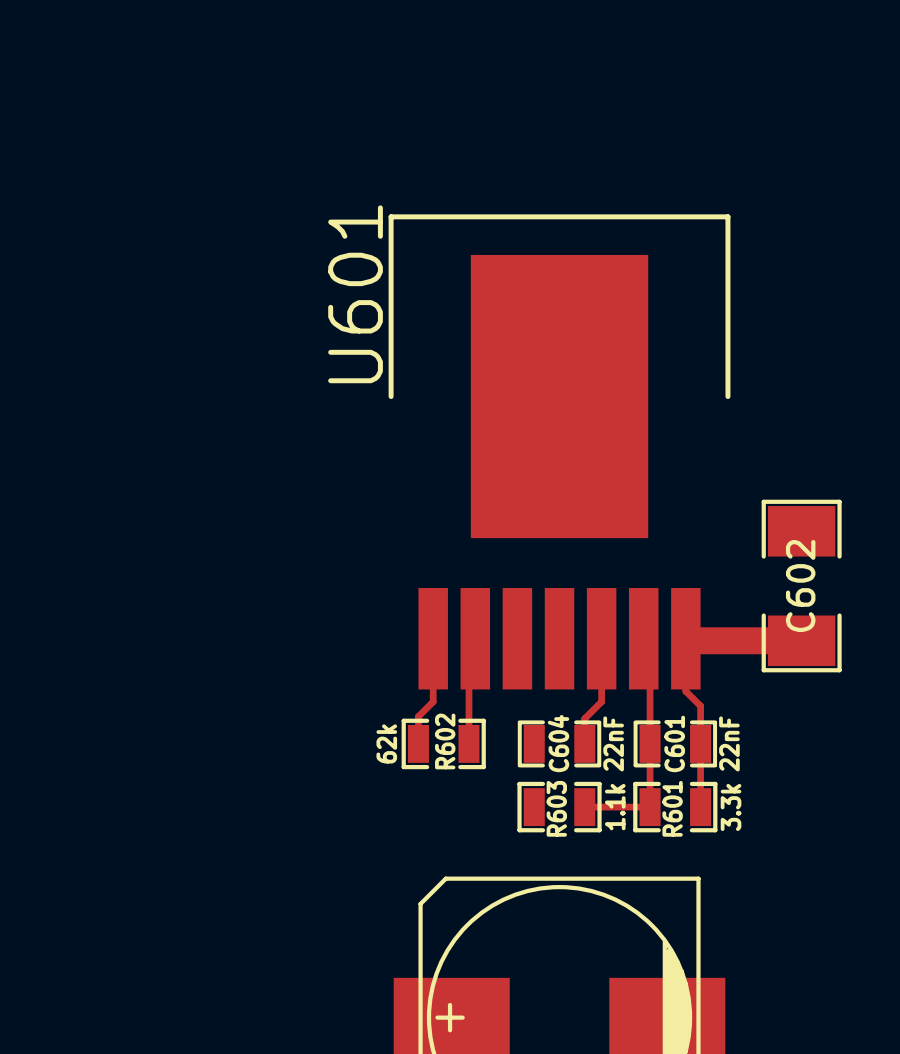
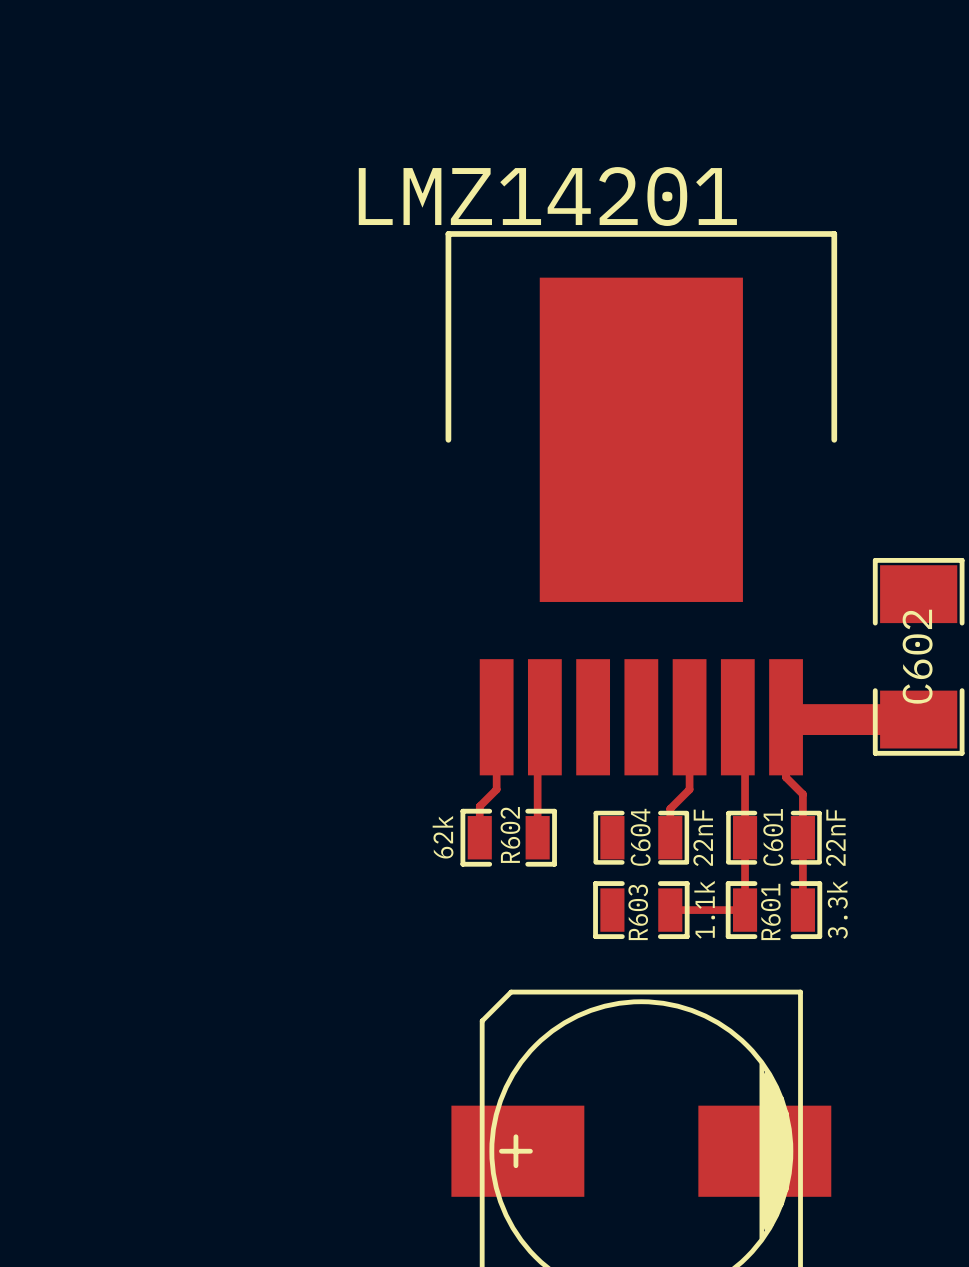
U601 value: none -> LMZ14201 (547, 196)
U601 name: U601 (355, 294) -> none

